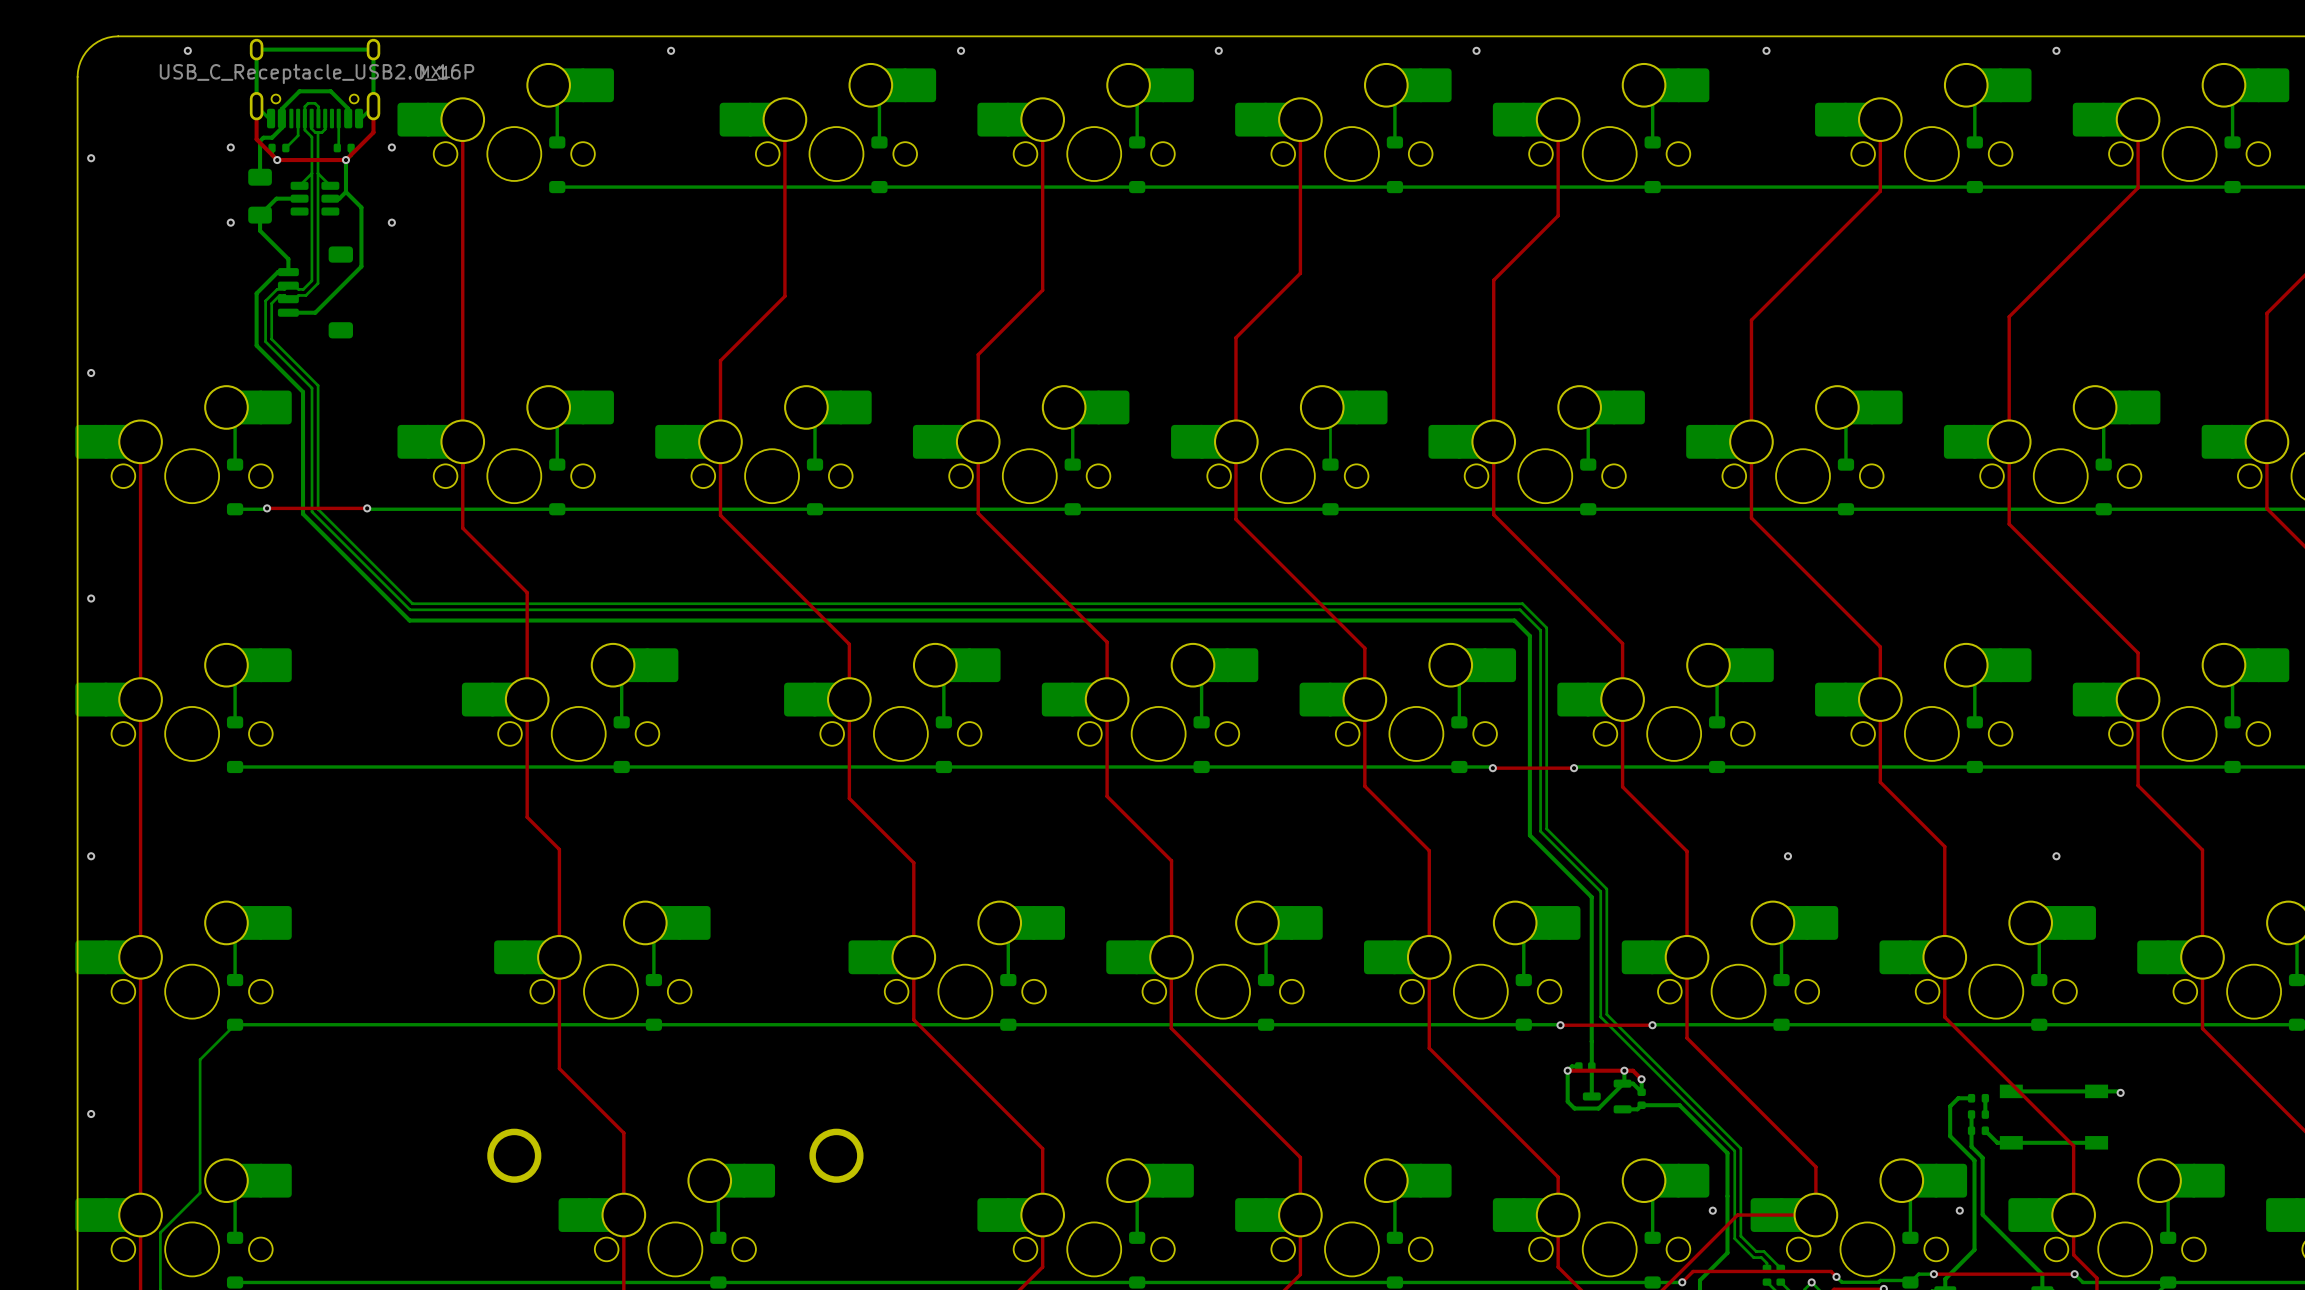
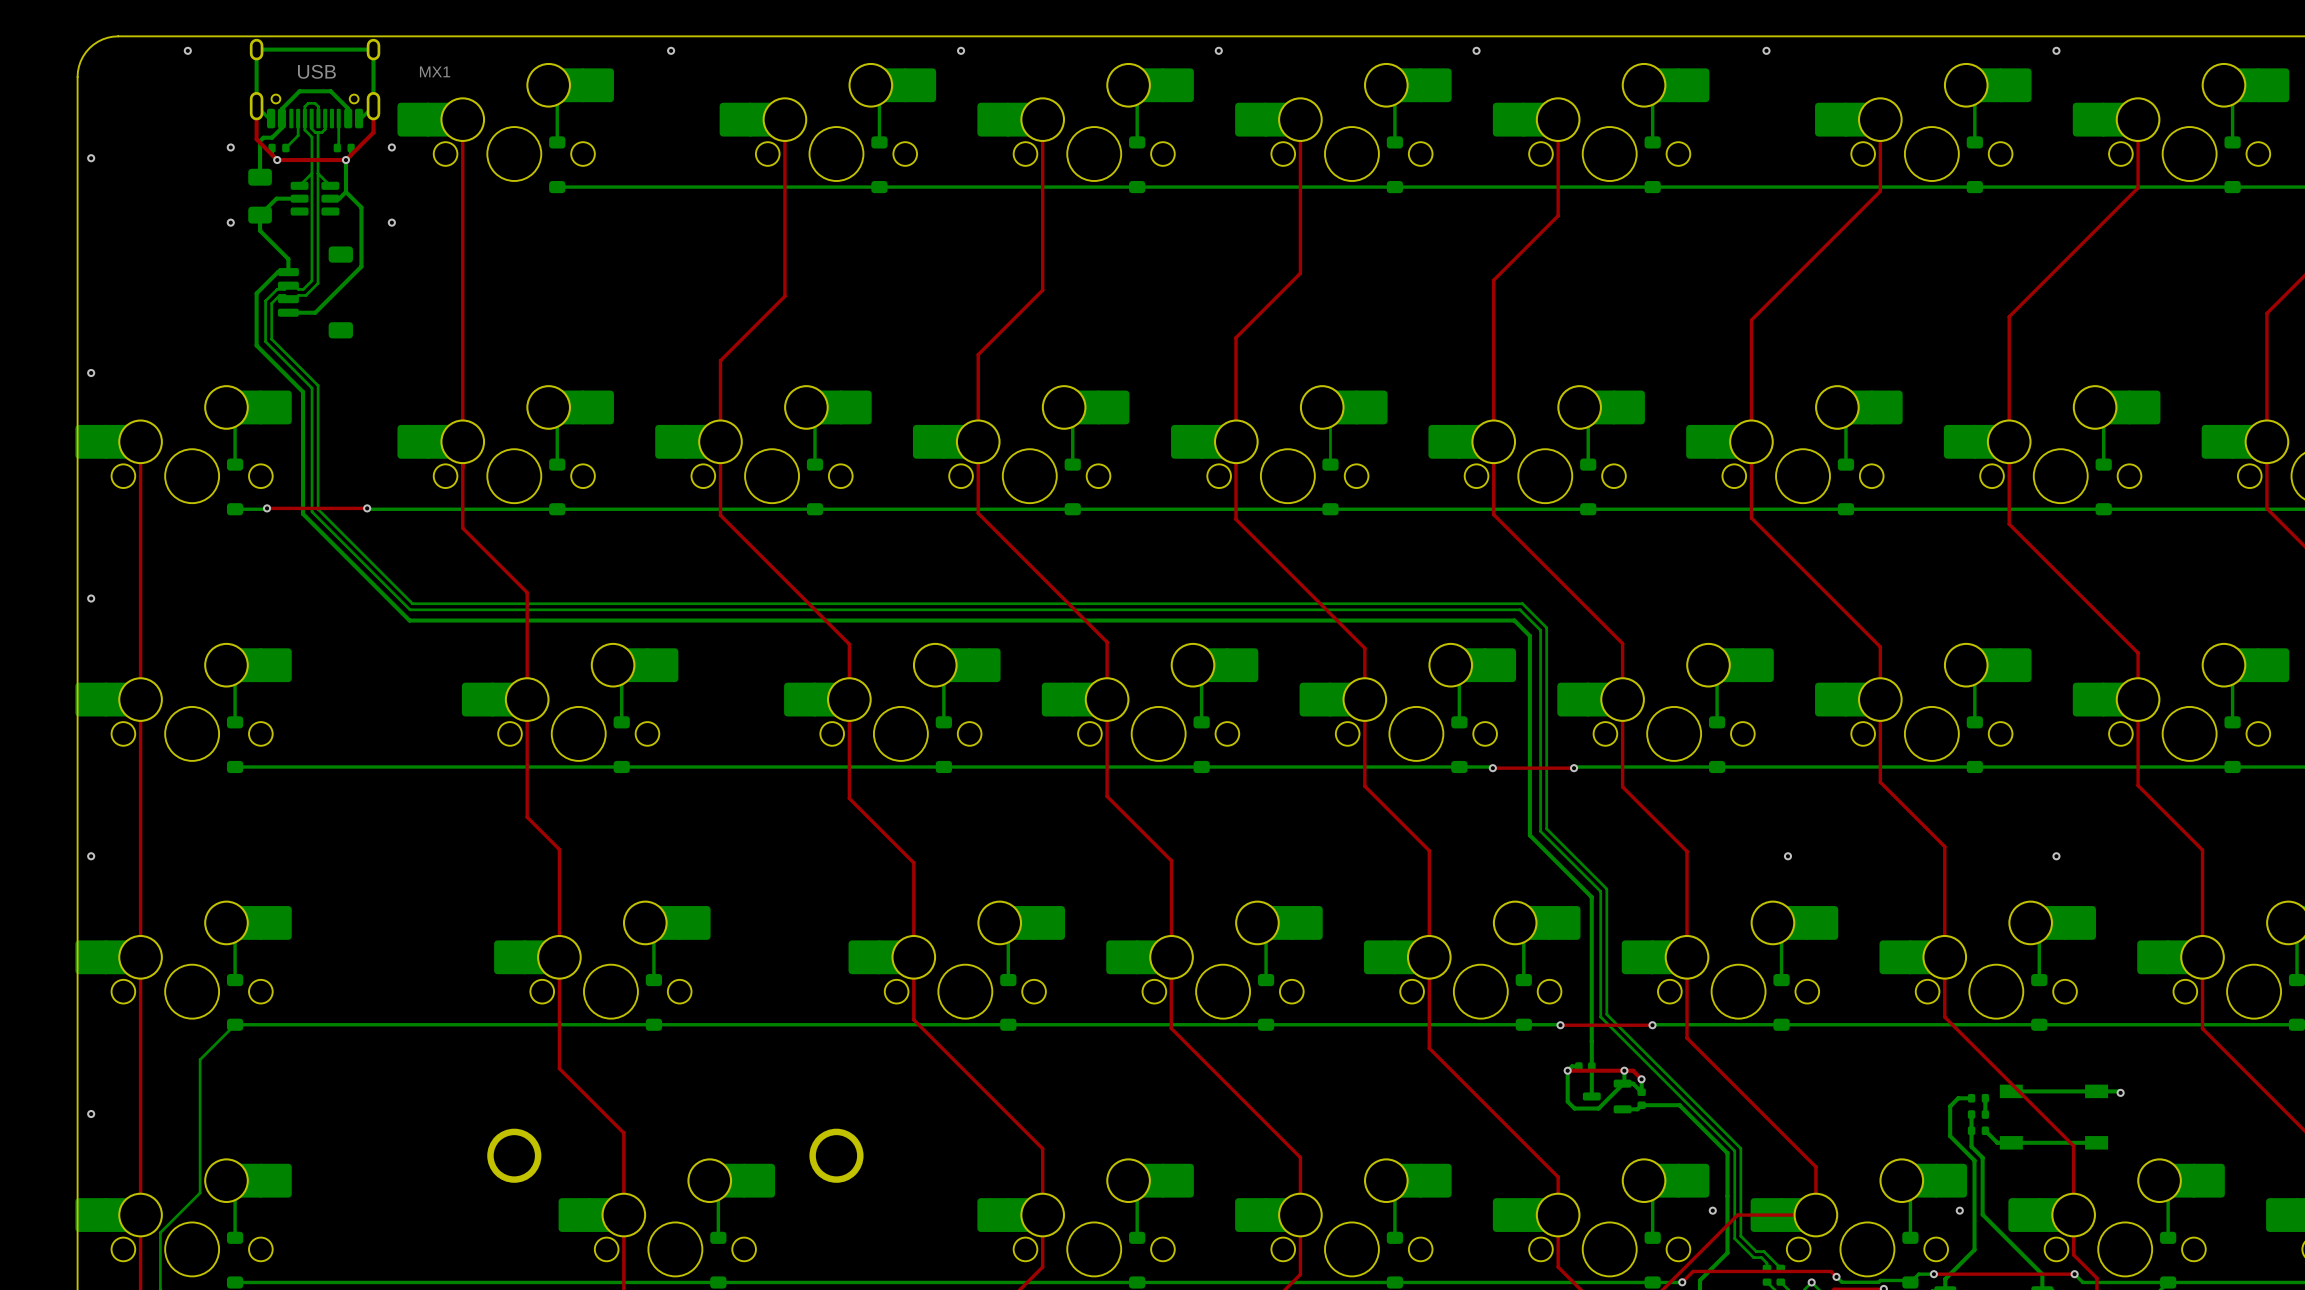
part value: USB_C_Receptacle_USB2.0_16P (317, 74) -> USB (316, 71)

